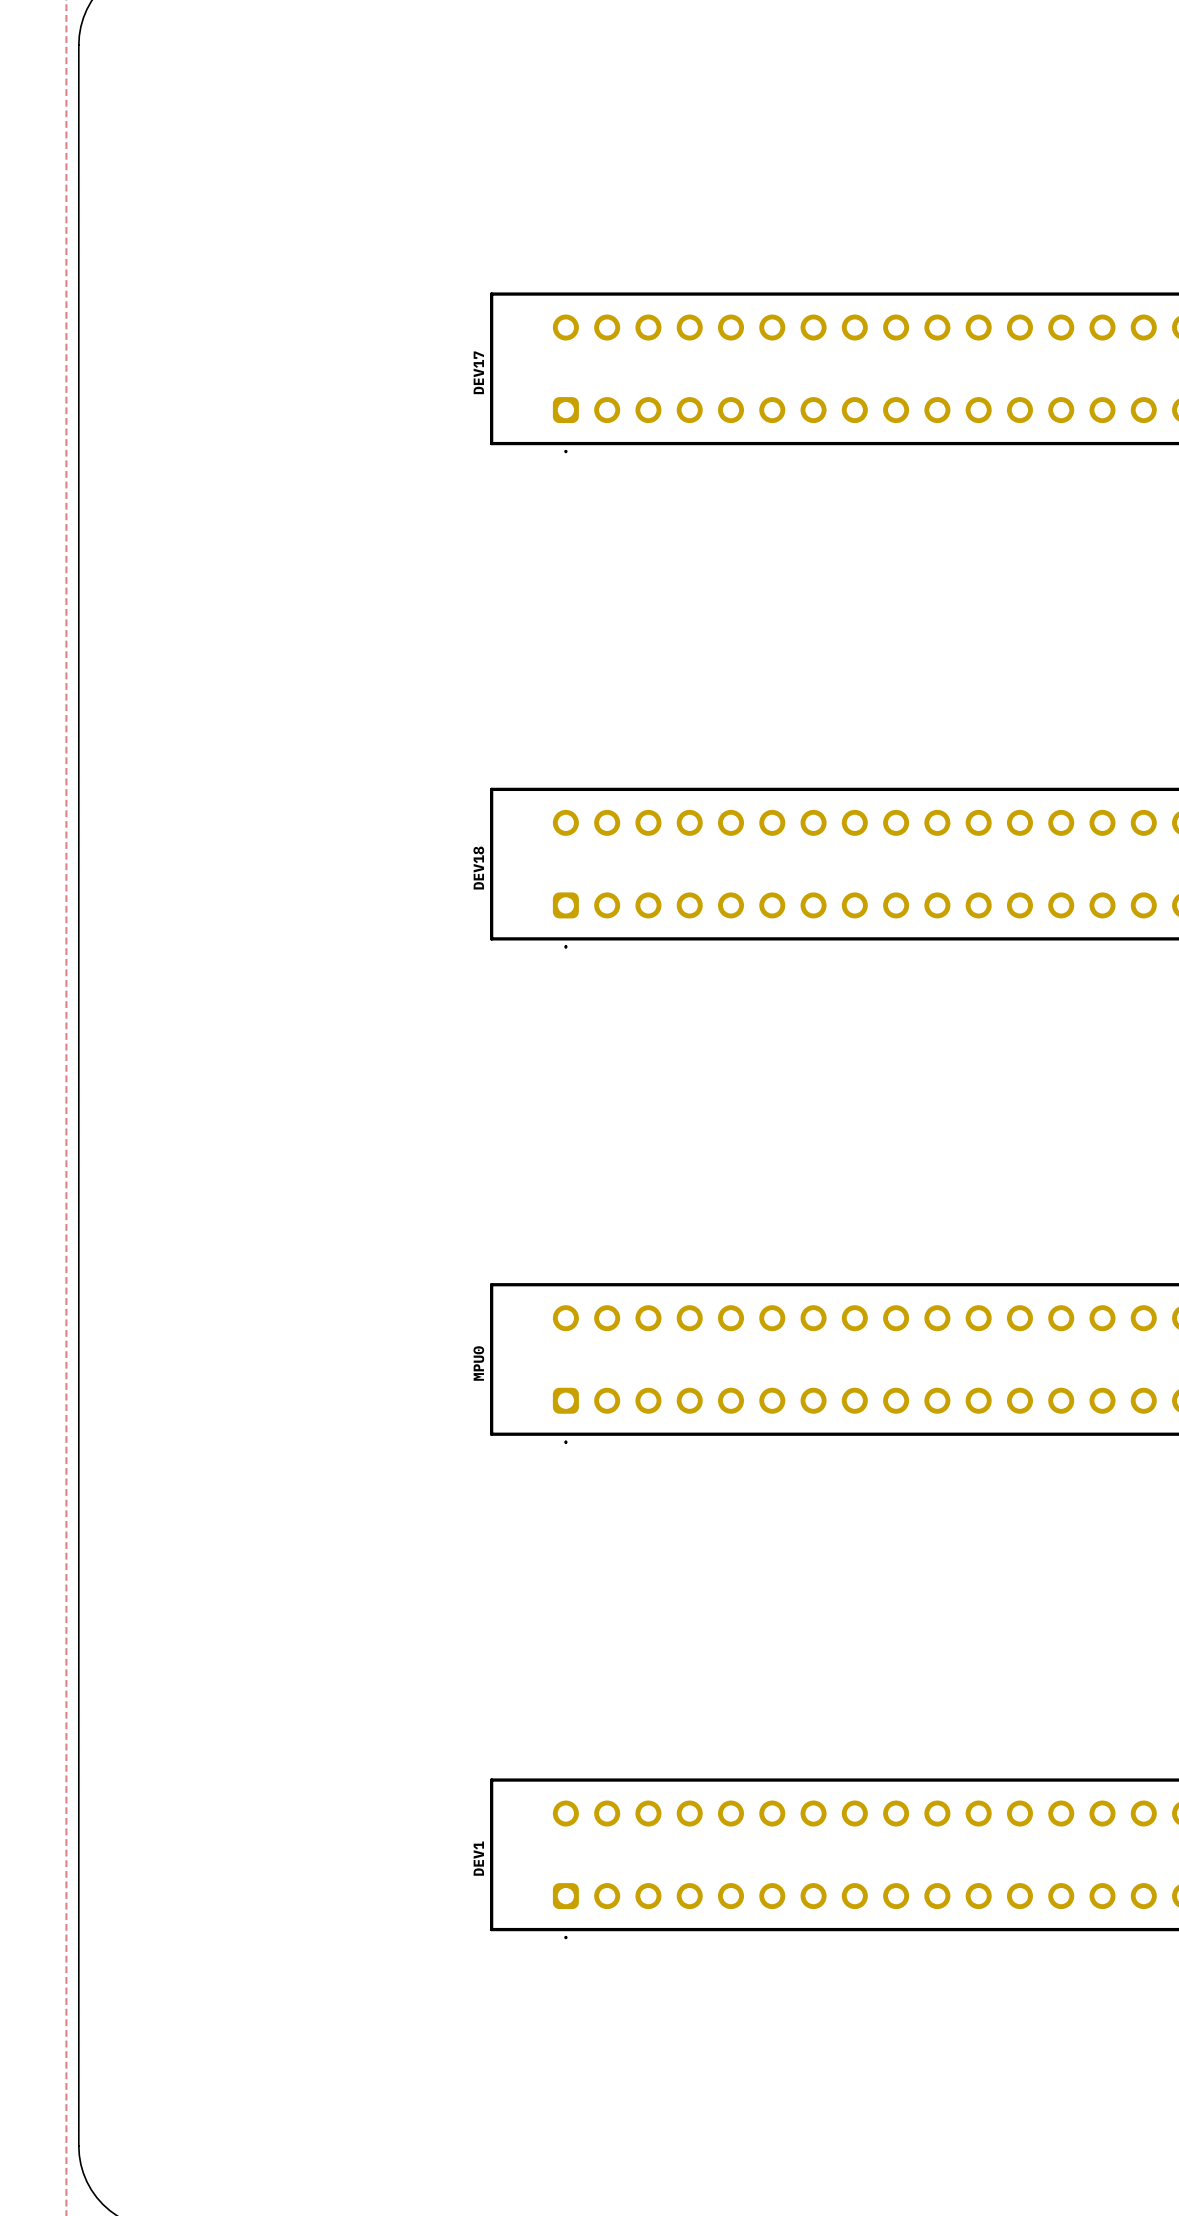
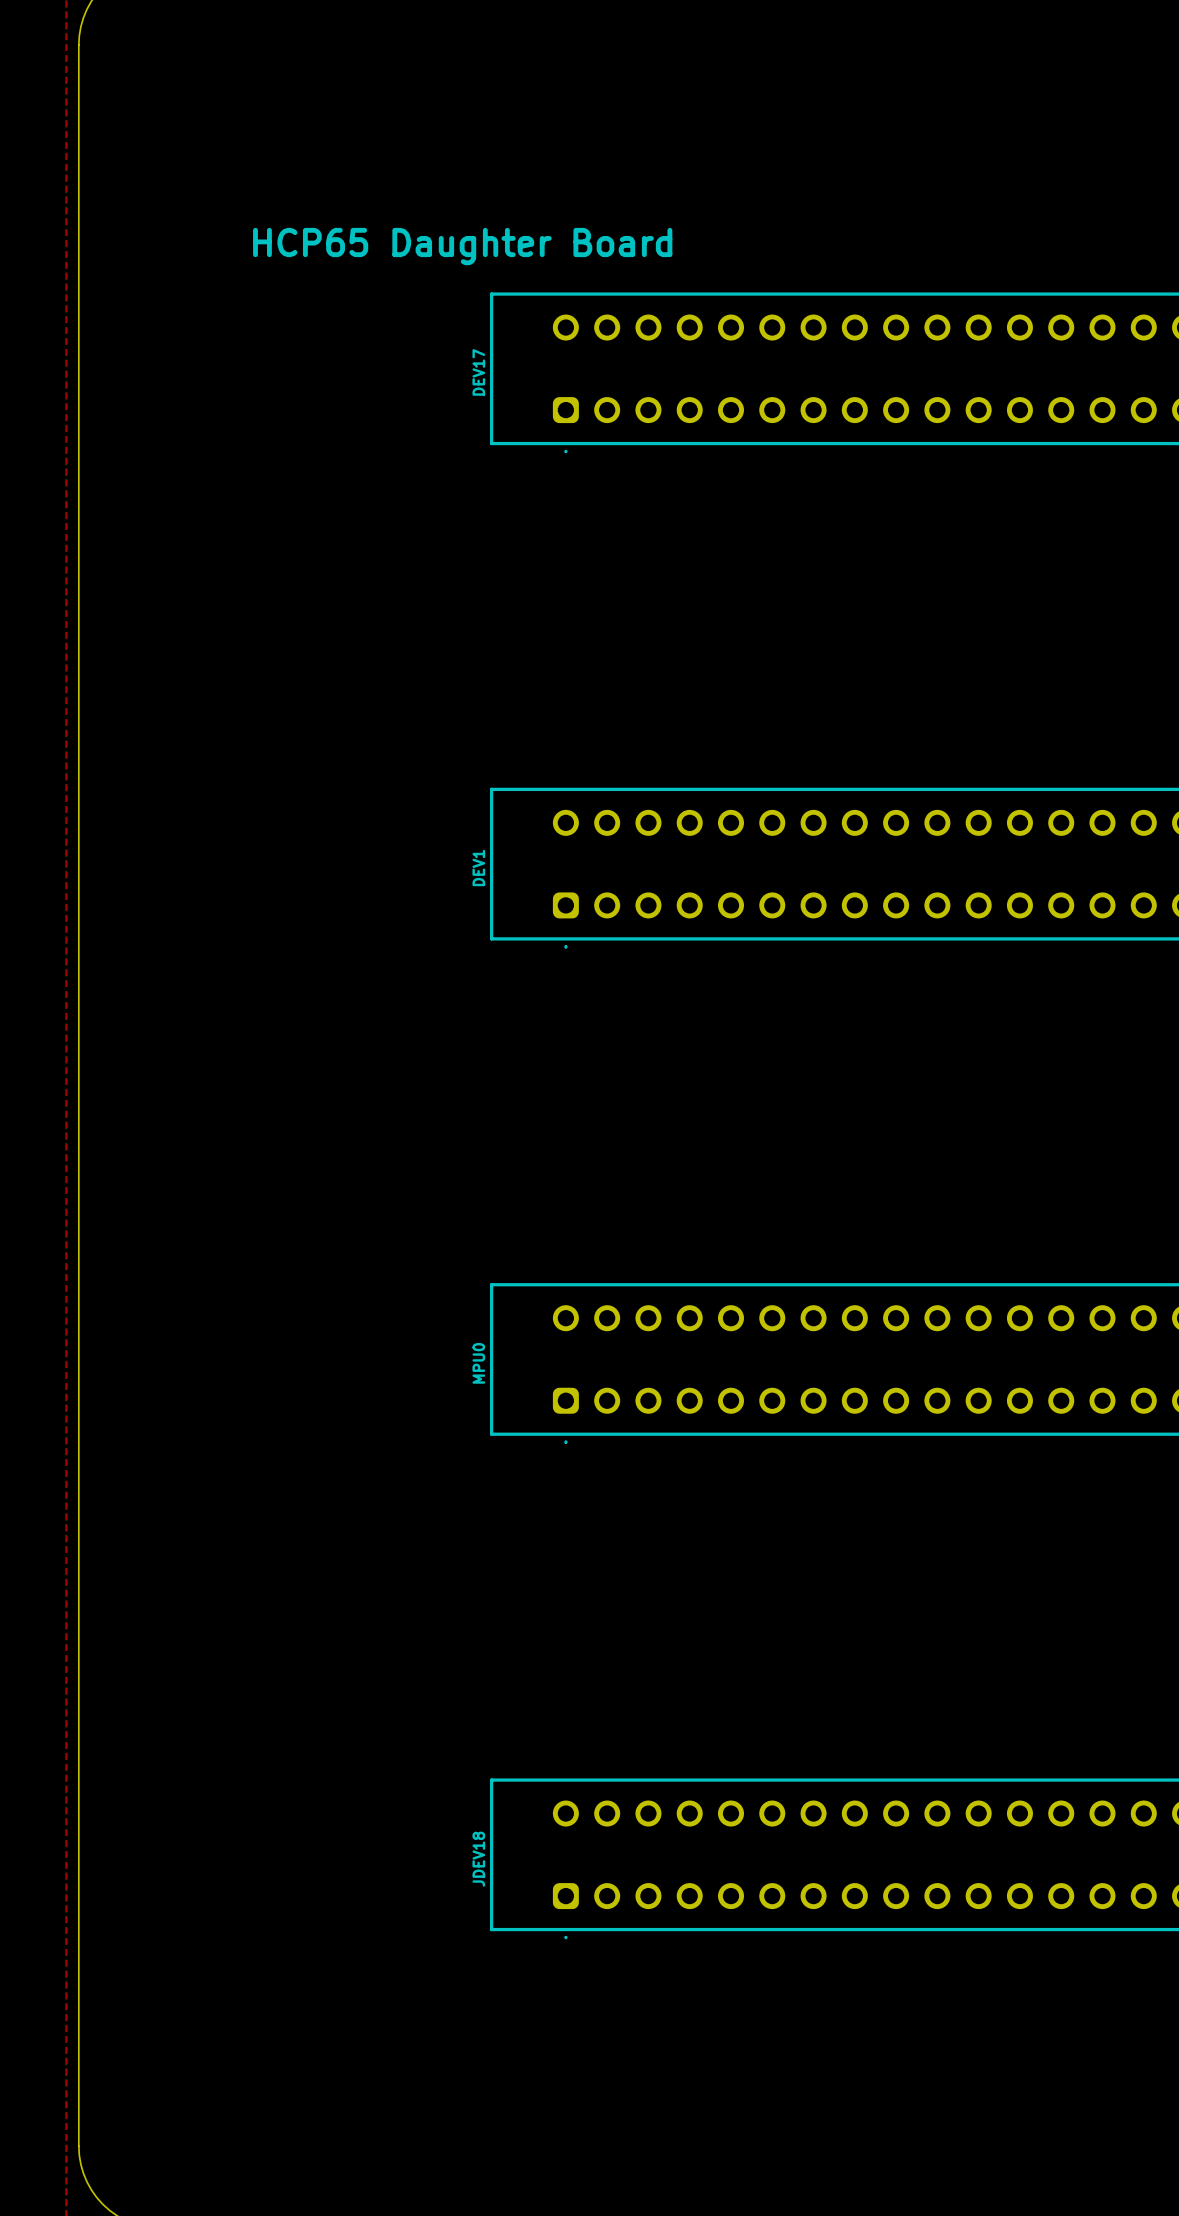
text: none -> HCP65 Daughter Board (462, 246)
DEV18 name: DEV18 (478, 868) -> DEV1 (478, 868)
DEV1 name: DEV1 (478, 1858) -> JDEV18 (478, 1859)

